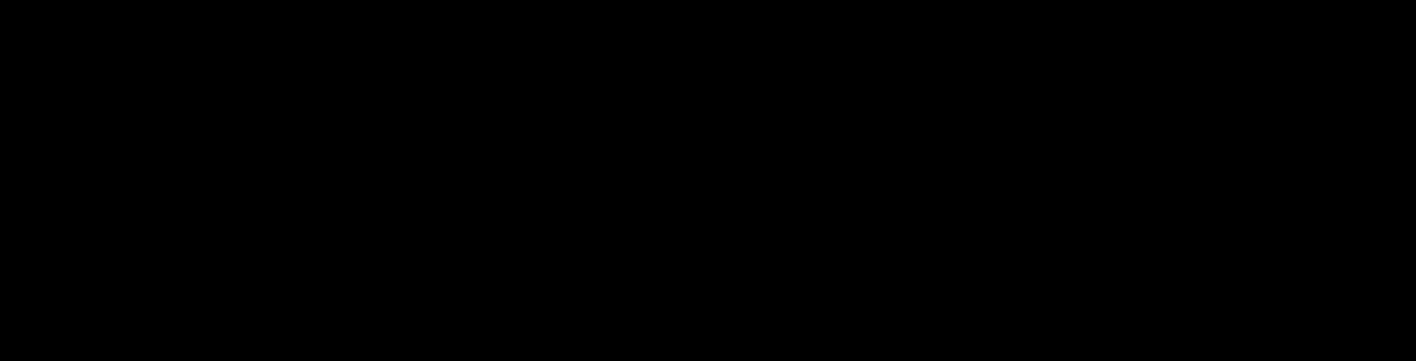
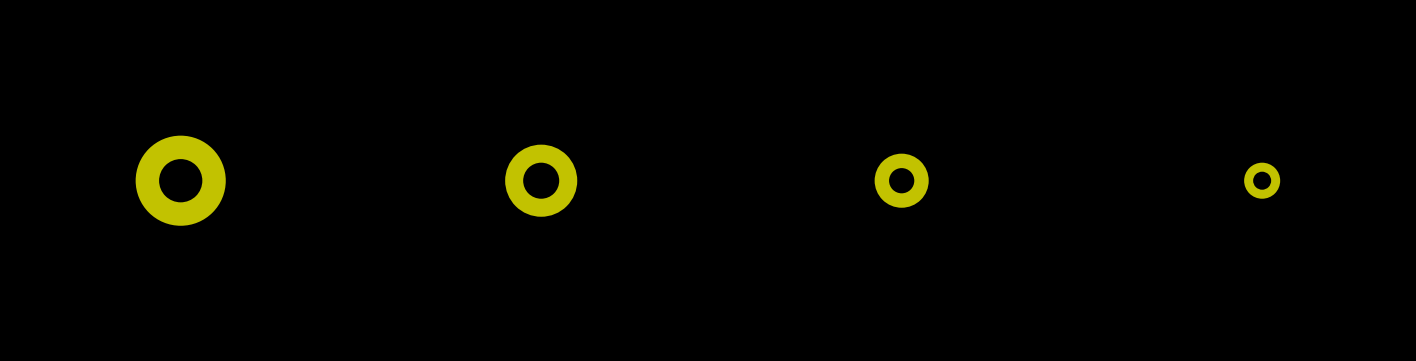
part: none -> (180, 180)
part: none -> (541, 180)
part: none -> (901, 180)
part: none -> (1262, 180)

